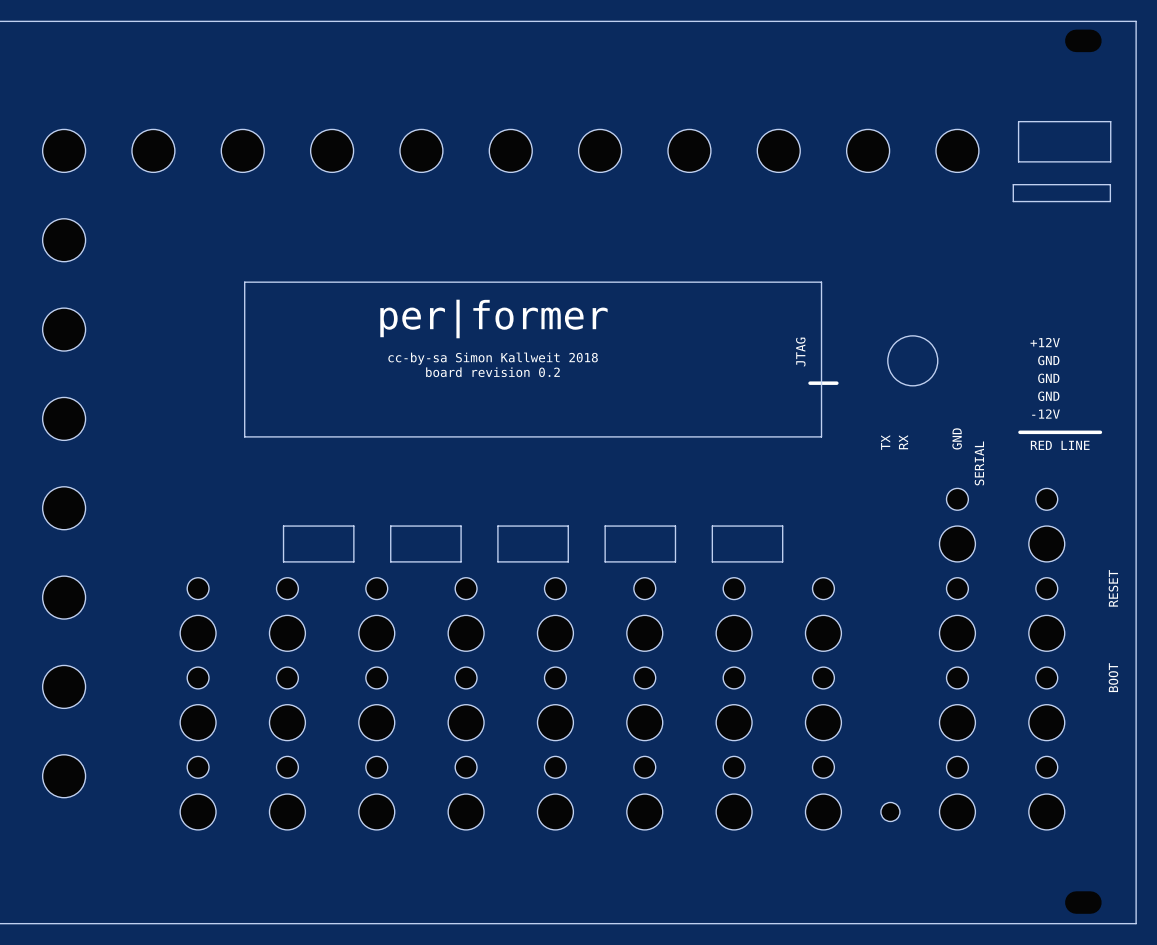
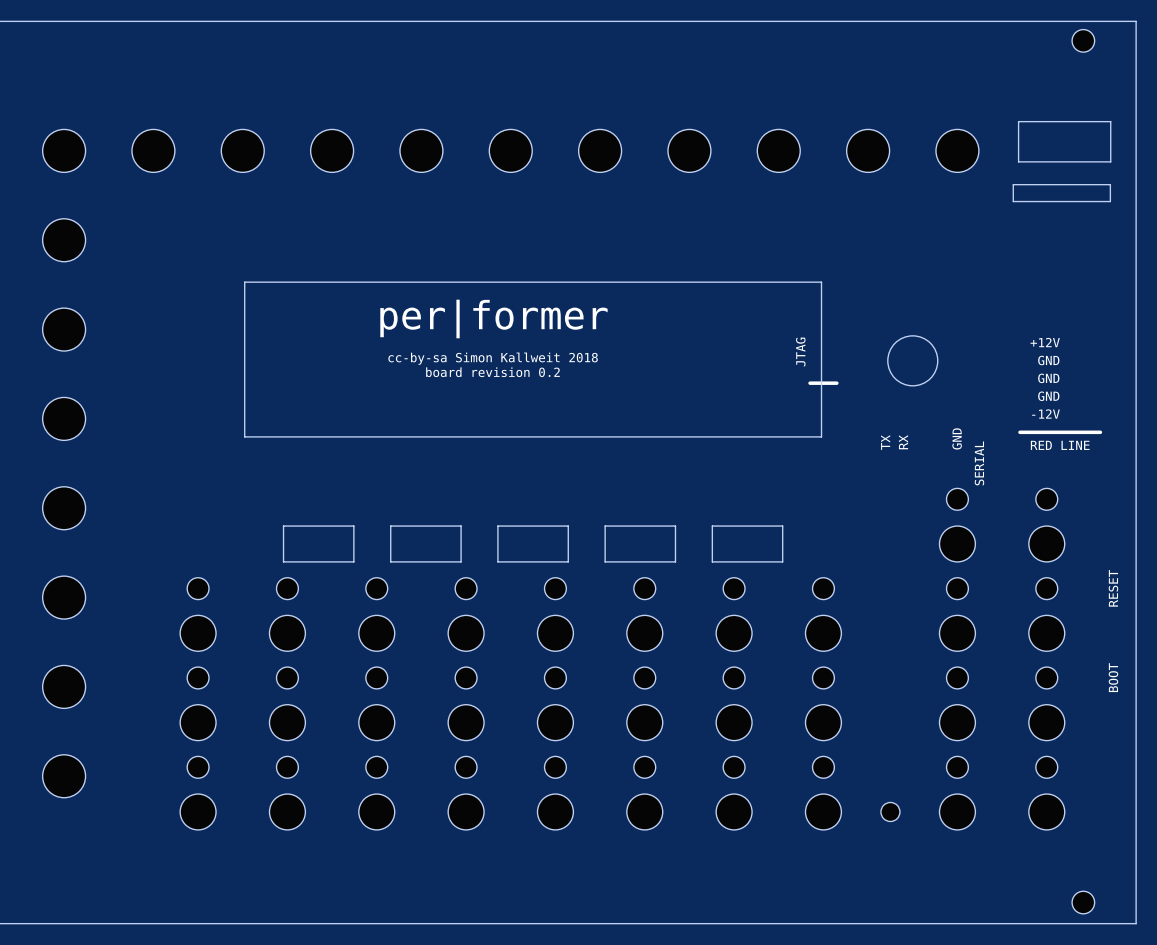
part footprint: [1065, 29, 1102, 53] -> [1072, 29, 1095, 53]
part footprint: [1065, 891, 1102, 914] -> [1072, 891, 1095, 914]

